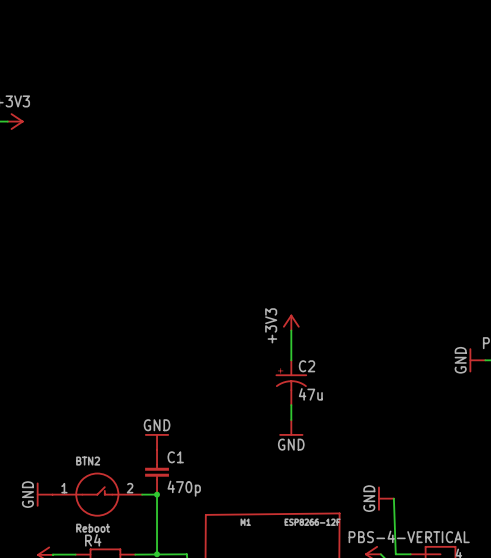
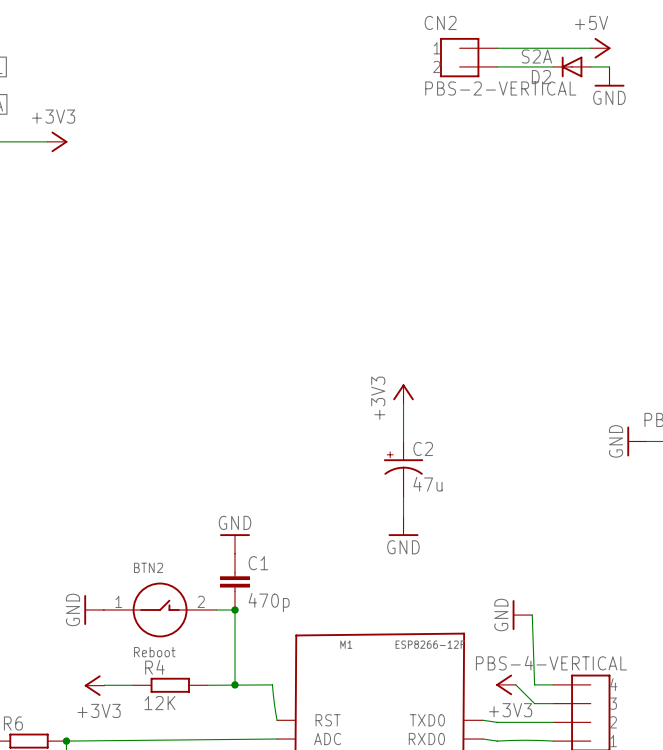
wire: none -> (497, 48) (590, 48)
power symbol: none -> +5V (600, 48)
CN2: none -> PBS-2-VERTICAL (468, 57)
wire: none -> (497, 66) (553, 66)
D2: none -> S2A (572, 66)
wire: none -> (590, 66) (609, 66)
power symbol: none -> GND (609, 76)

